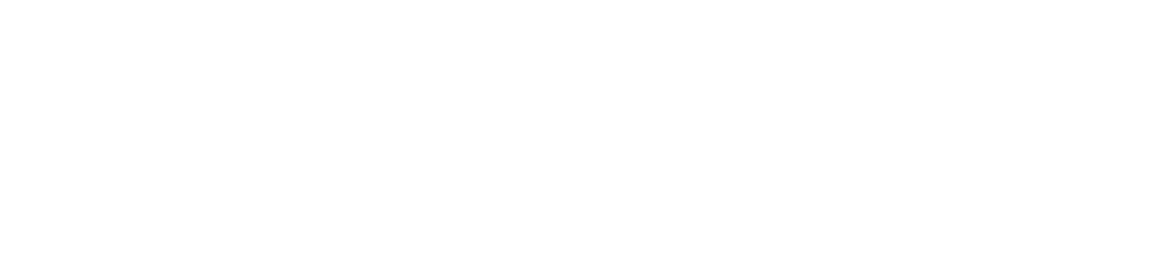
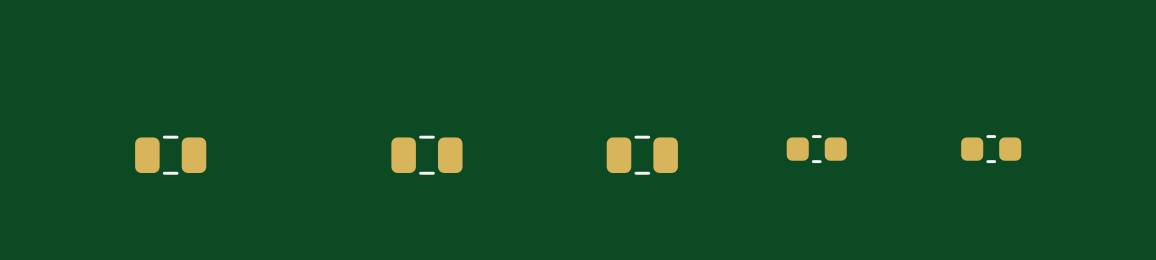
part: none -> (816, 149)
part: none -> (991, 149)
part: none -> (170, 155)
part: none -> (426, 155)
part: none -> (642, 155)

